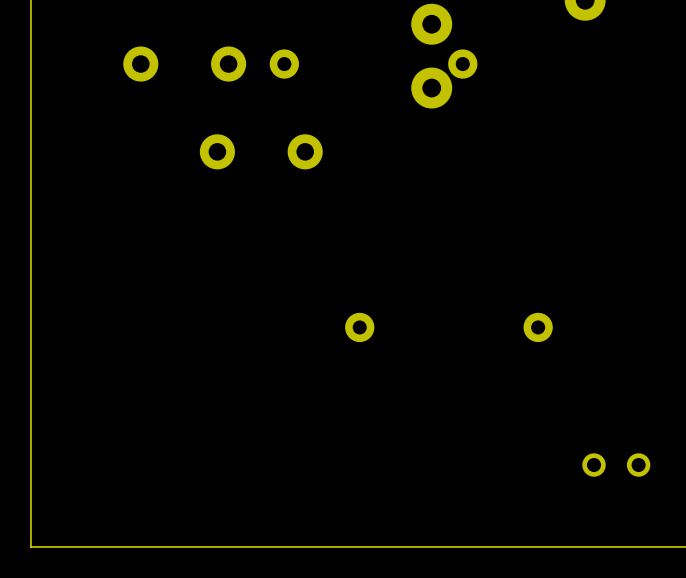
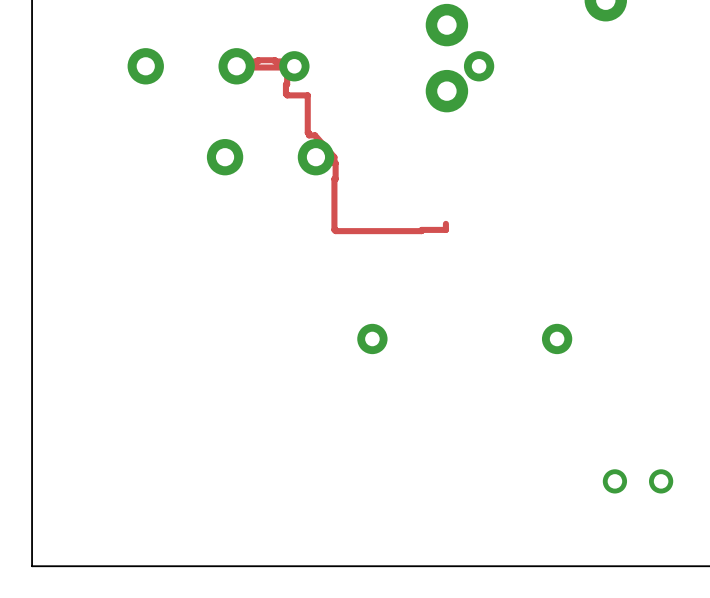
top track: none -> (293, 67) (293, 61) (275, 60) (241, 61) (236, 66) (287, 67) (285, 94) (307, 95) (307, 132) (308, 135) (315, 135) (334, 157) (335, 163) (334, 229) (445, 229) (445, 223)

